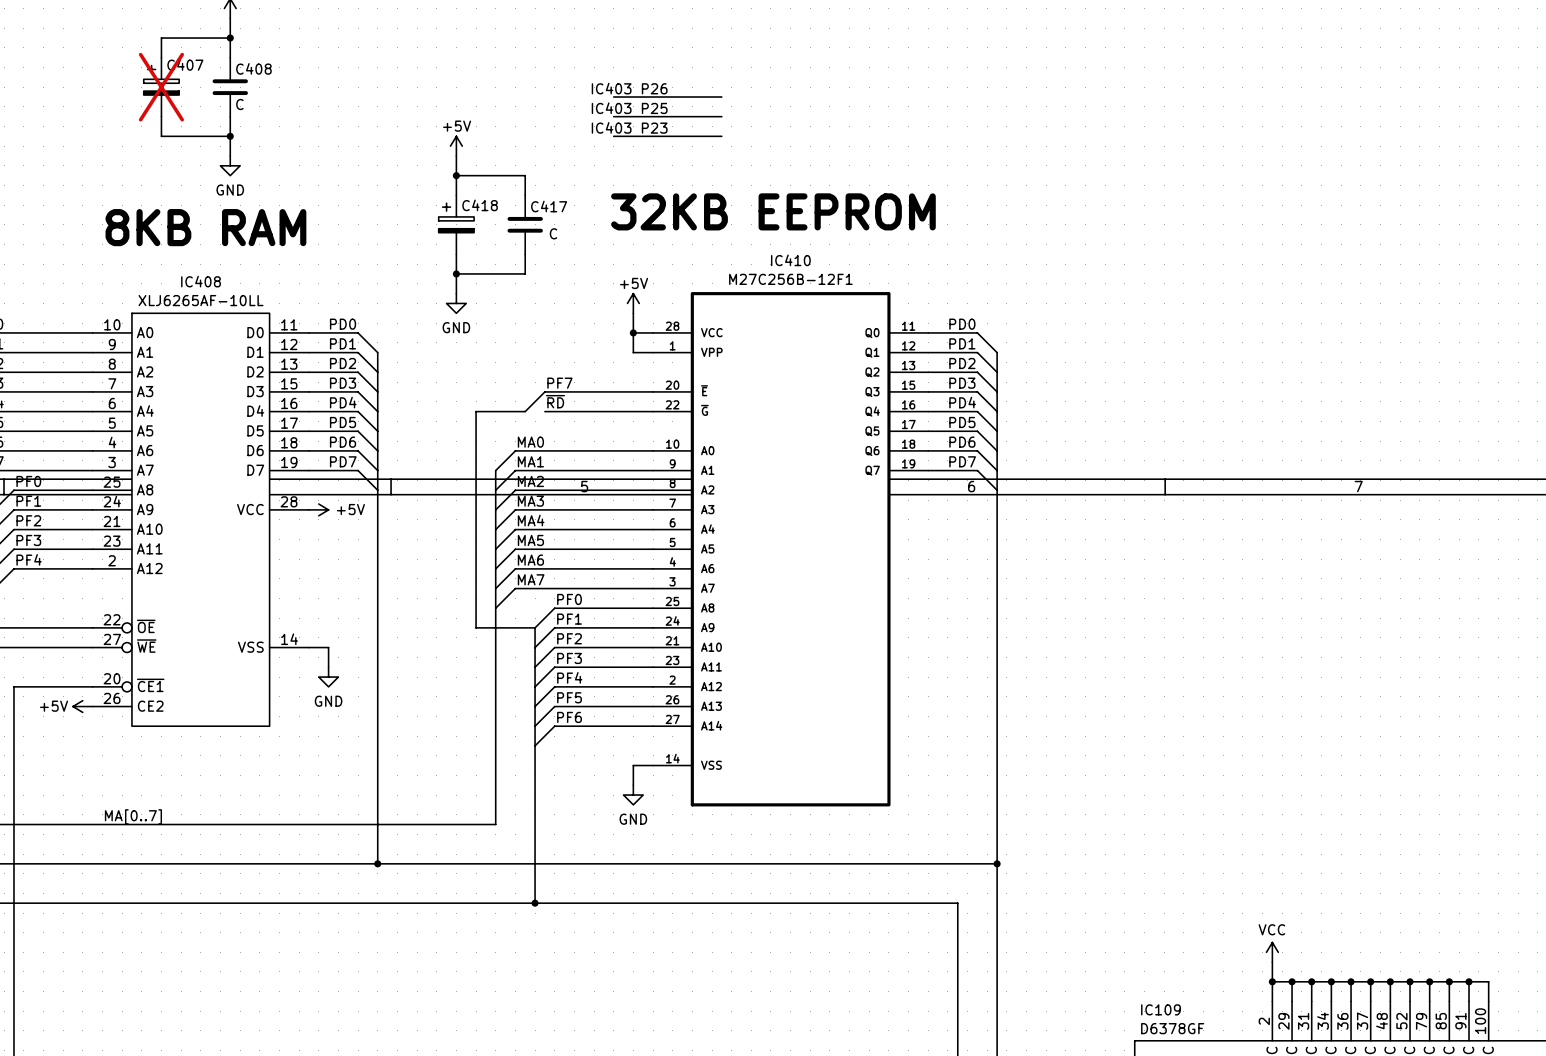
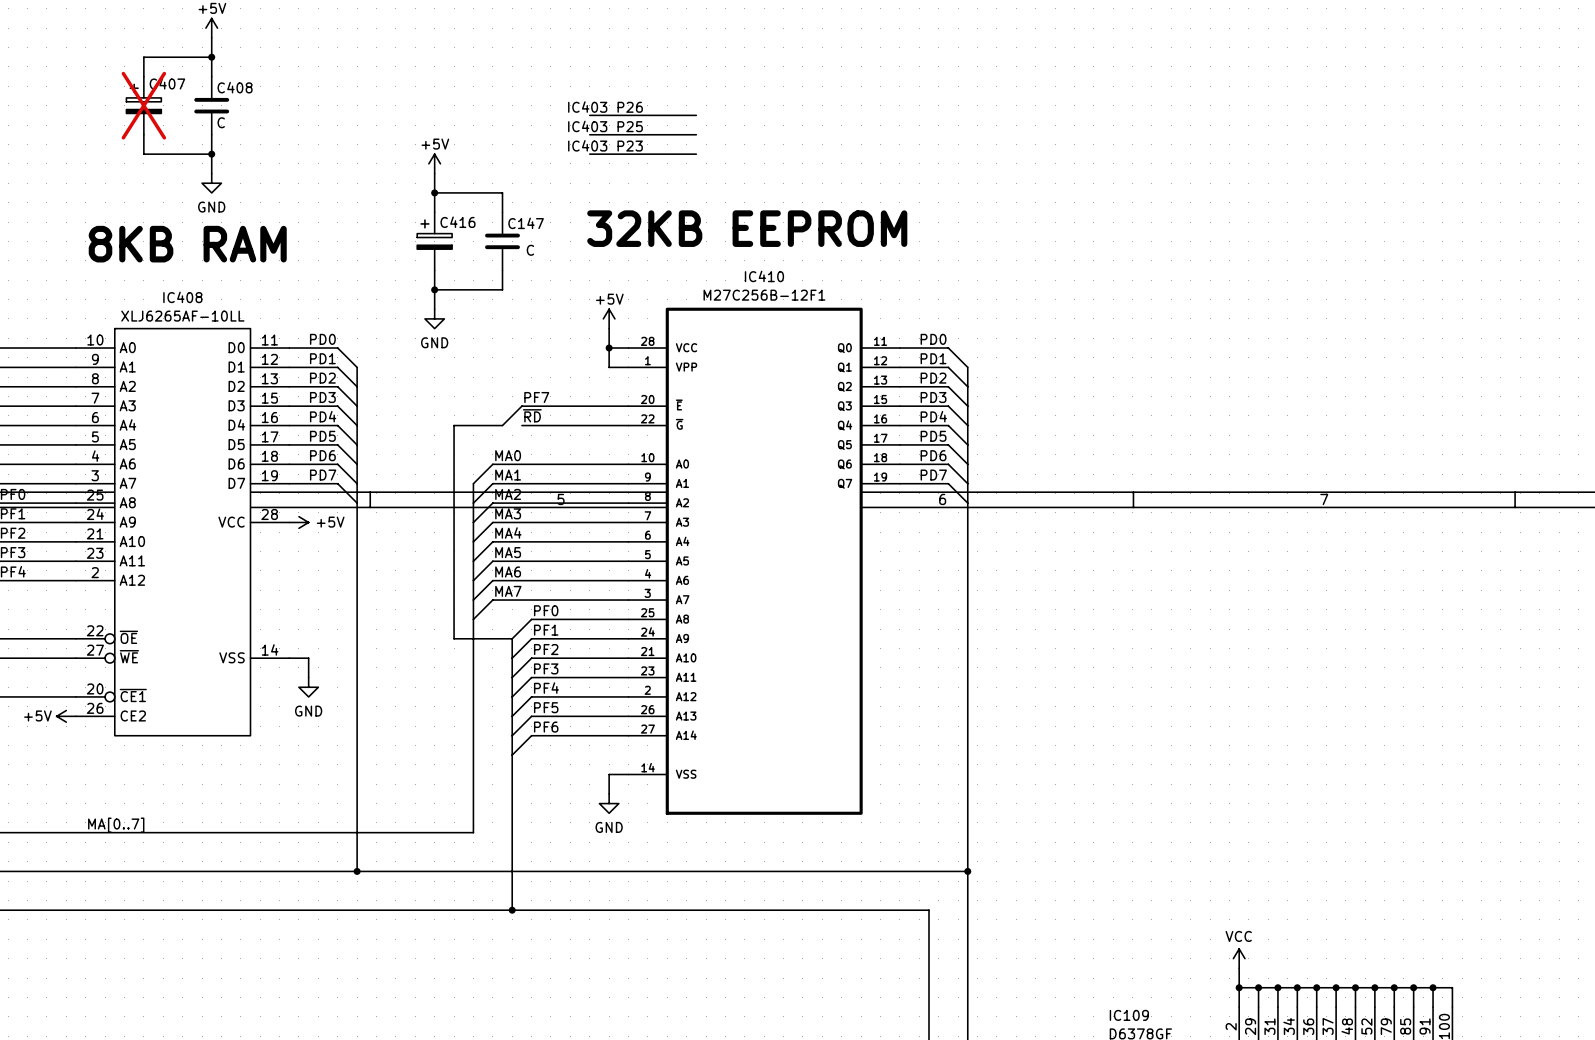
C418 name: C418 (480, 205) -> C416 (457, 222)
C417 name: C417 (549, 206) -> C147 (526, 223)

